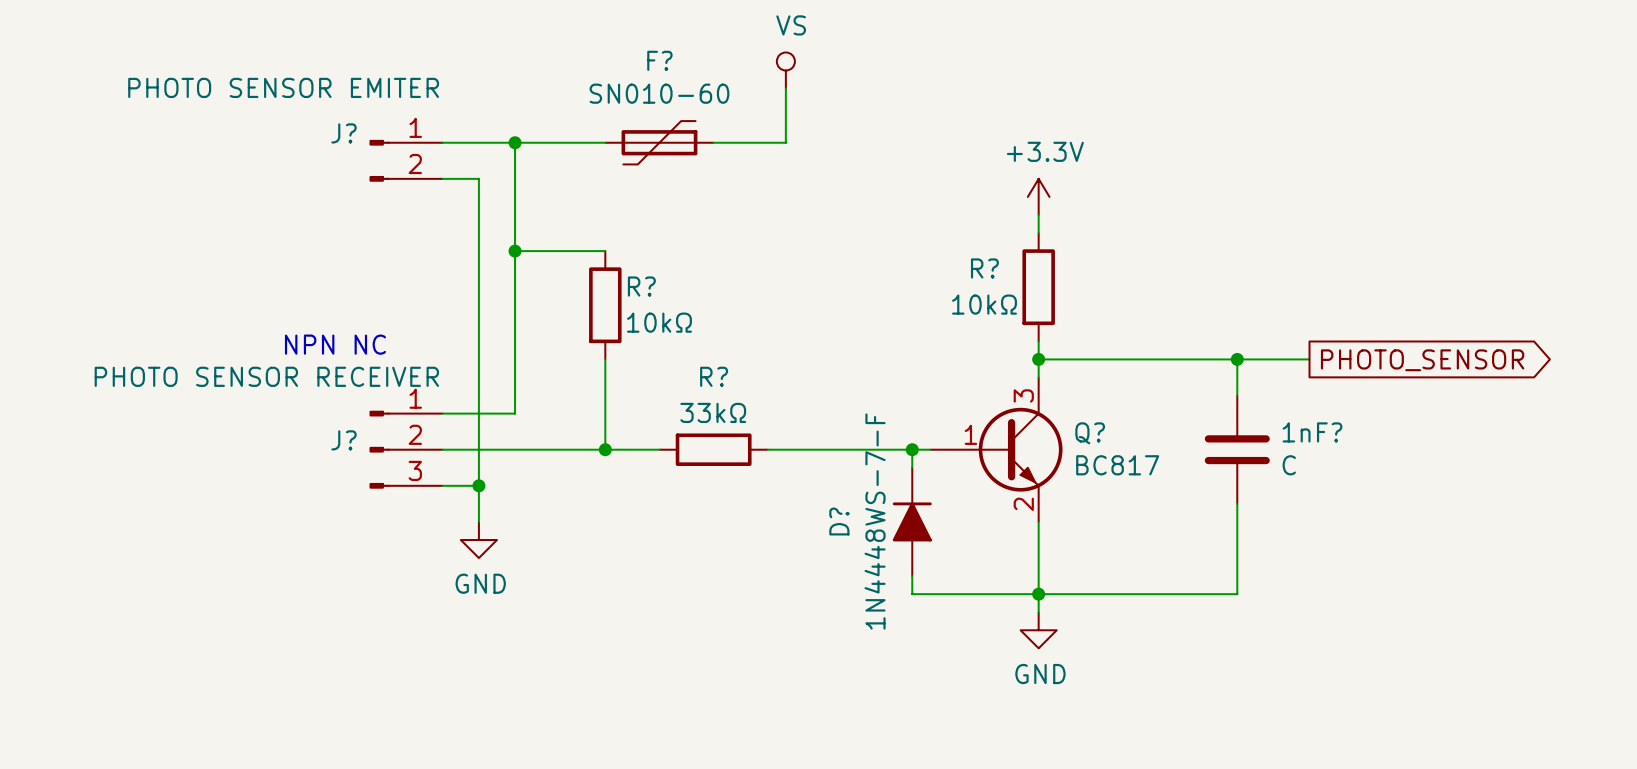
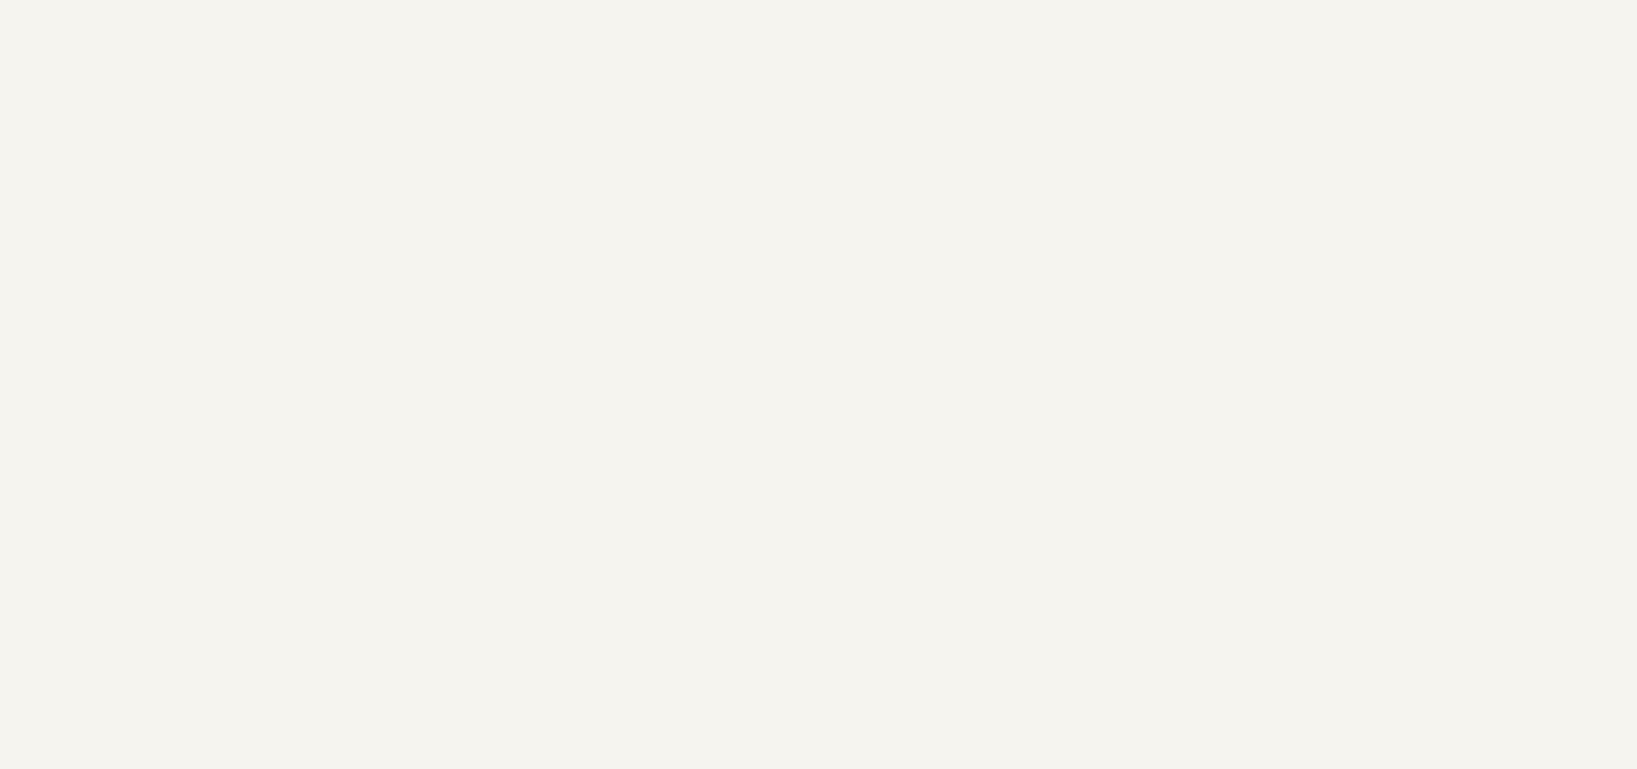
power symbol: VS (785, 70) -> none
wire: (785, 88) (785, 142) (713, 142) -> none
wire: (442, 142) (605, 142) -> none
wire: (515, 142) (515, 413) (442, 413) -> none
junction: (515, 142) -> none
F?: SN010-60 (659, 142) -> none
J?: PHOTO SENSOR EMITER (406, 160) -> none
wire: (442, 178) (478, 178) (478, 521) -> none
power symbol: +3.3V (1038, 196) -> none
wire: (1038, 214) (1038, 233) -> none
wire: (515, 251) (605, 251) -> none
junction: (515, 251) -> none
R?: 10kΩ (1038, 287) -> none
R?: 10kΩ (605, 305) -> none
wire: (1038, 341) (1038, 377) -> none
text: NPN NC (335, 344) -> none
wire: (605, 359) (605, 449) -> none
wire: (1038, 359) (1309, 359) -> none
junction: (1038, 359) -> none
wire: (1237, 359) (1237, 395) -> none
junction: (1237, 359) -> none
global label: PHOTO_SENSOR (1422, 360) -> none
J?: PHOTO SENSOR RECEIVER (406, 449) -> none
wire: (442, 449) (659, 449) -> none
junction: (605, 449) -> none
R?: 33kΩ (713, 449) -> none
wire: (767, 449) (930, 449) -> none
wire: (912, 449) (912, 467) -> none
junction: (912, 449) -> none
Q?: BC817 (996, 449) -> none
1nF?: C (1237, 449) -> none
wire: (442, 485) (478, 485) -> none
junction: (478, 485) -> none
wire: (1237, 503) (1237, 594) (912, 594) (912, 576) -> none
D?: 1N4448WS-7-F (912, 521) -> none
wire: (1038, 521) (1038, 612) -> none
power symbol: GND (478, 539) -> none
junction: (1038, 594) -> none
power symbol: GND (1038, 630) -> none

